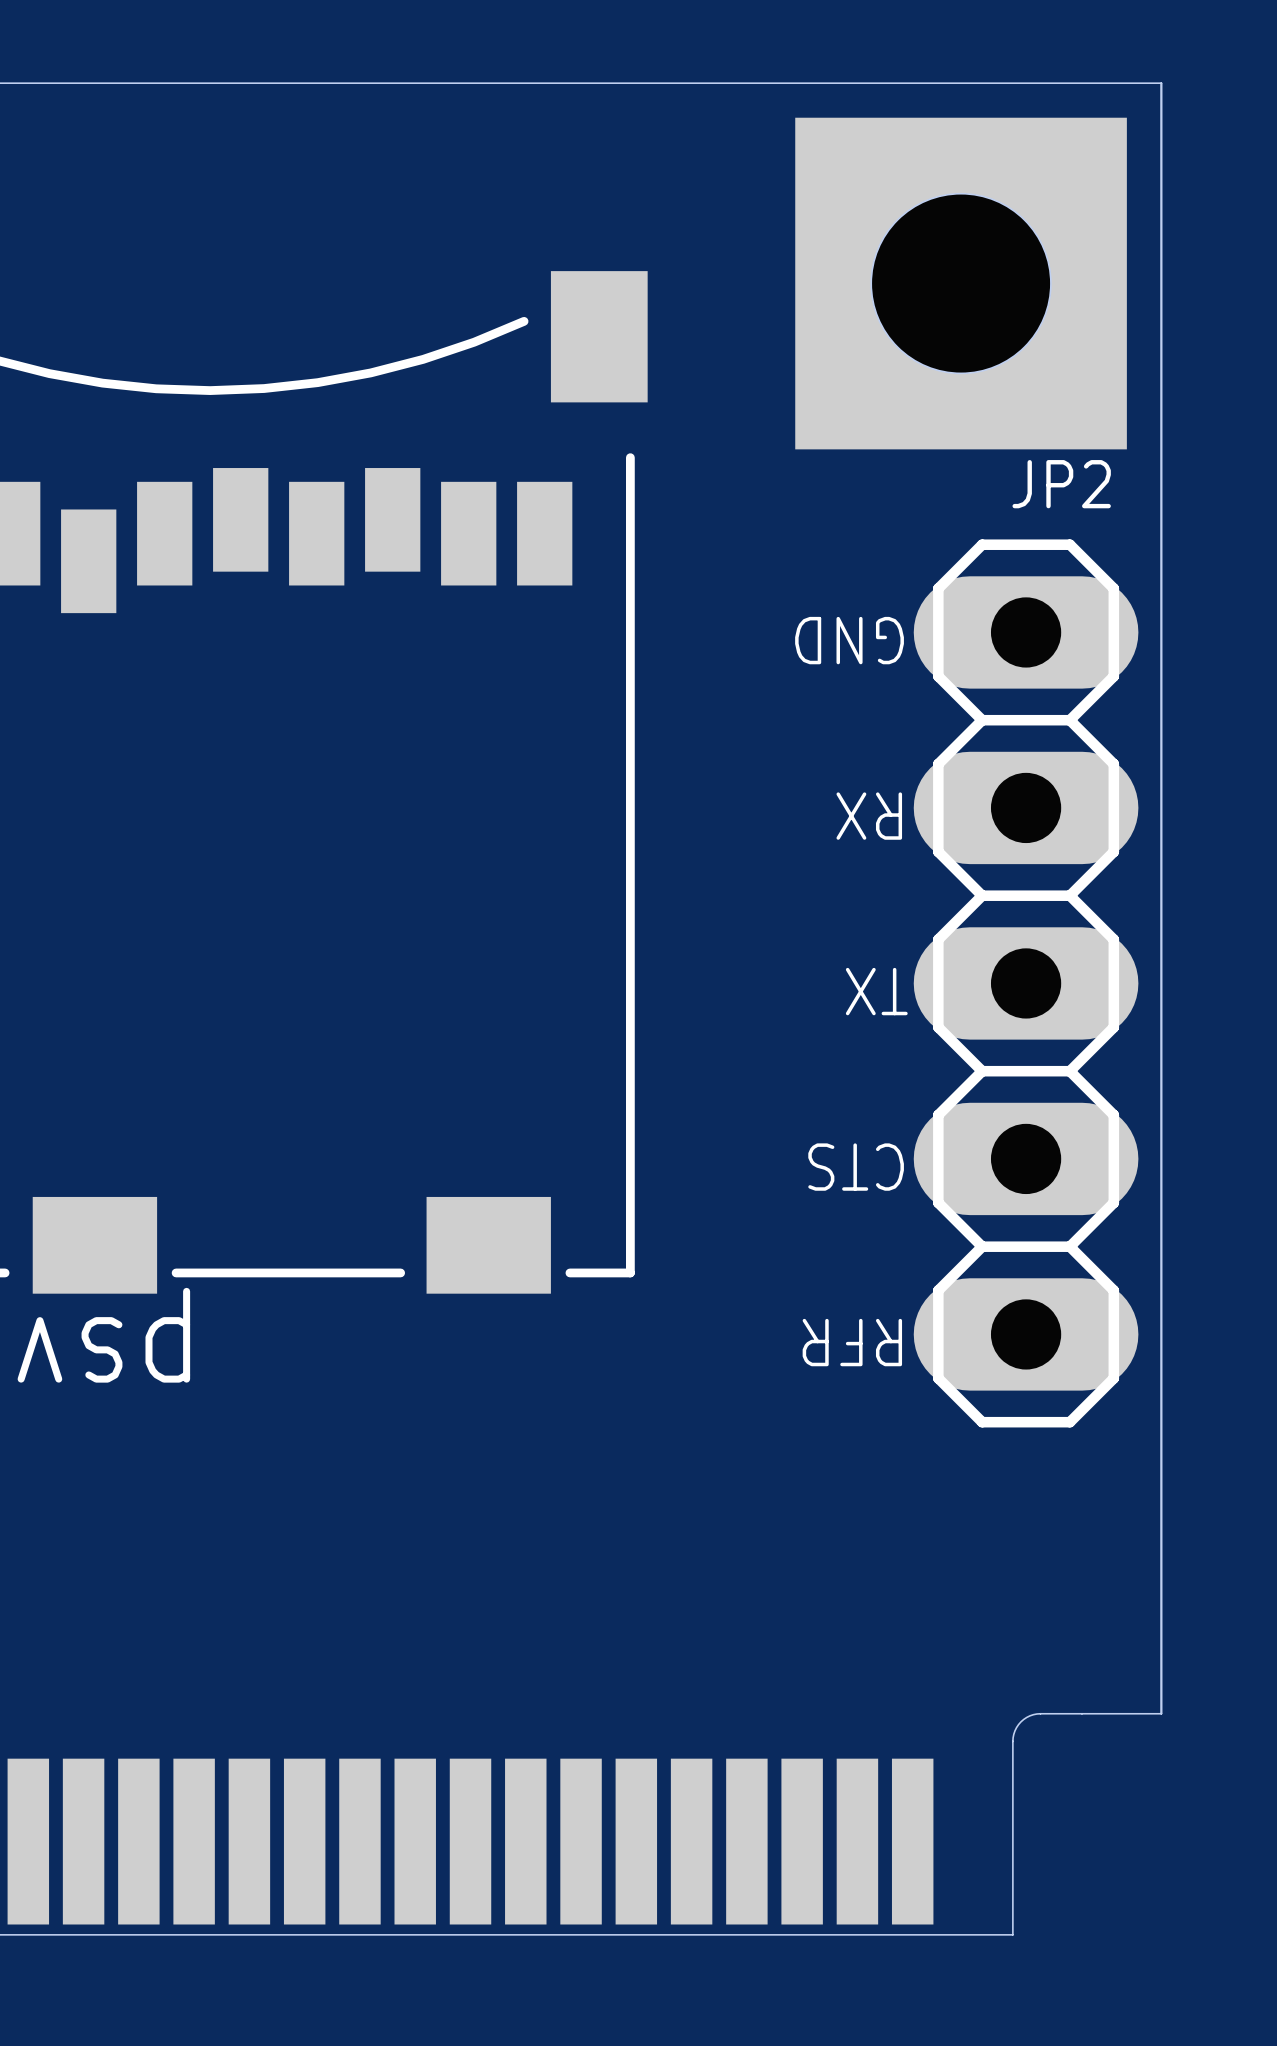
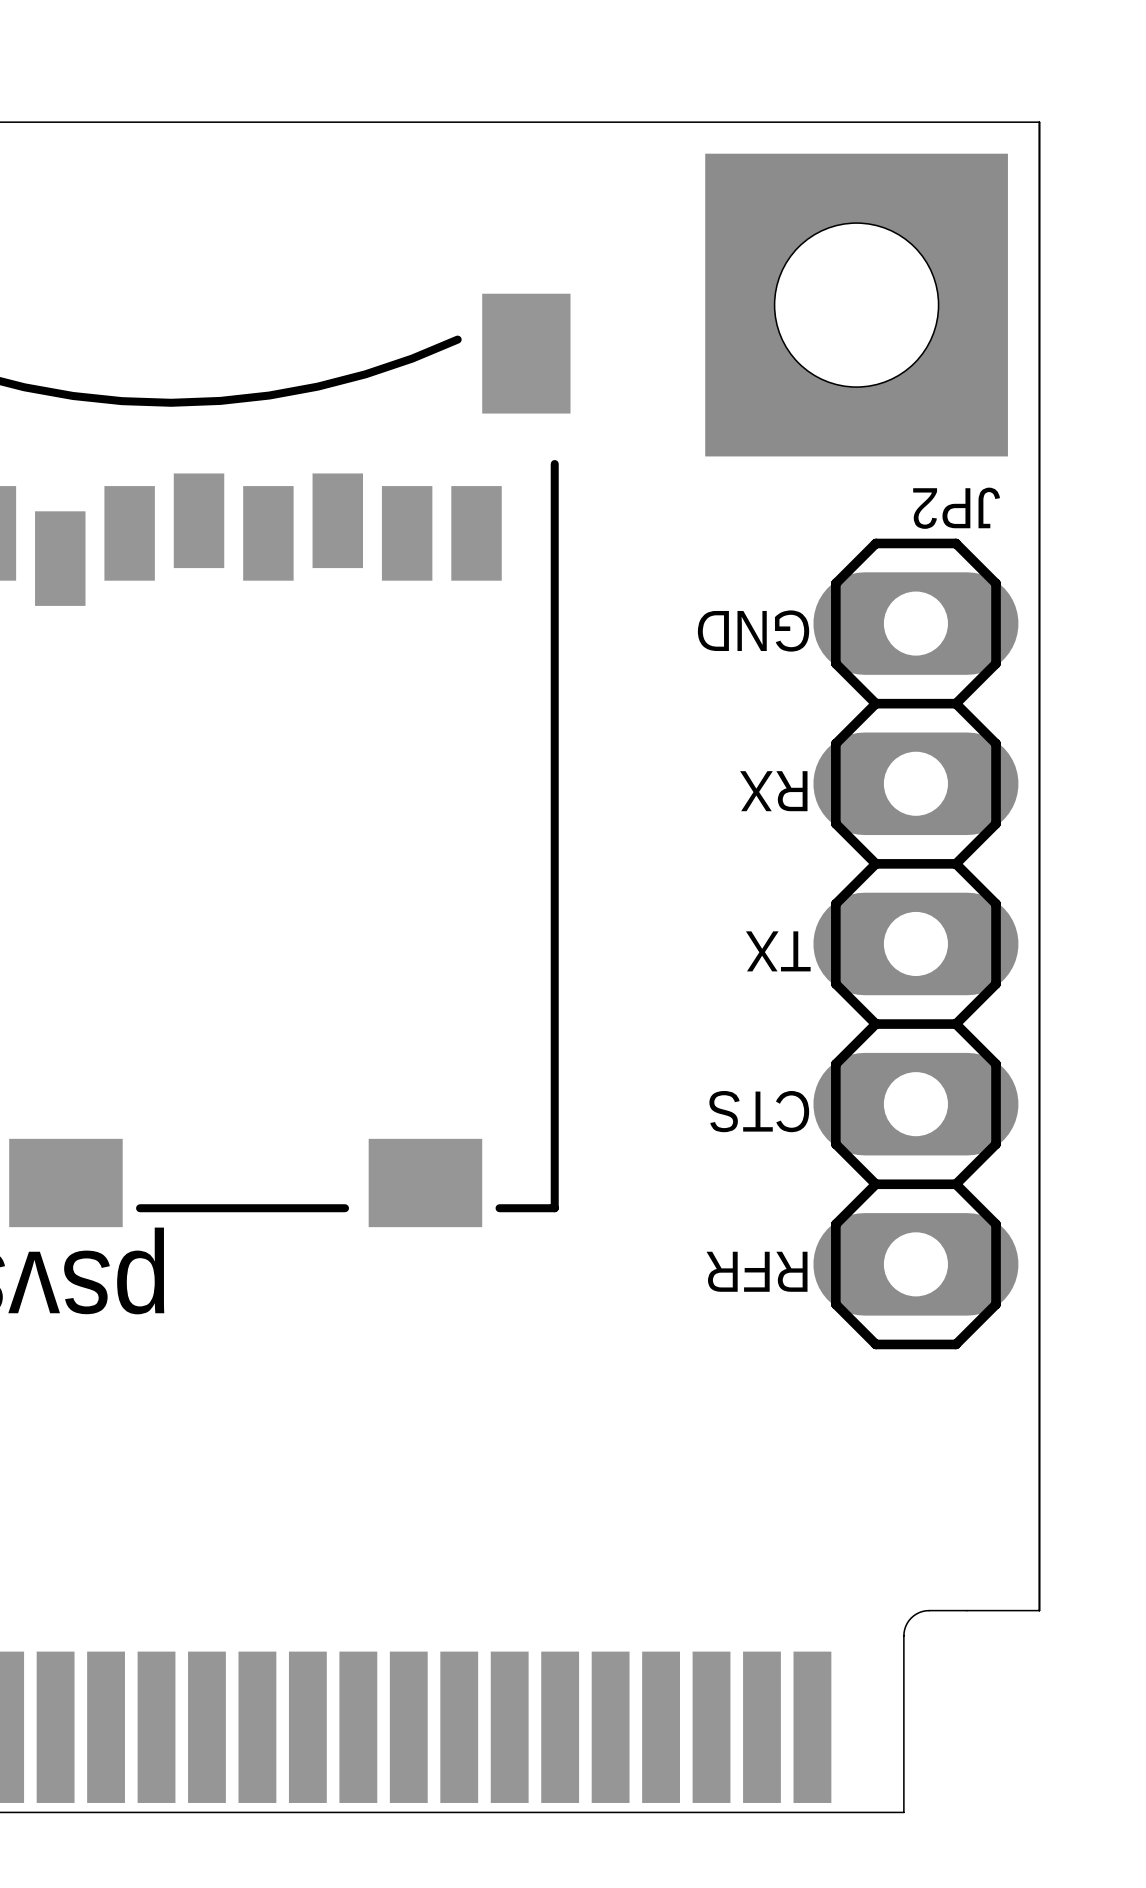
JP2 name rotation: 0° (1061, 484) -> 180° (956, 508)

